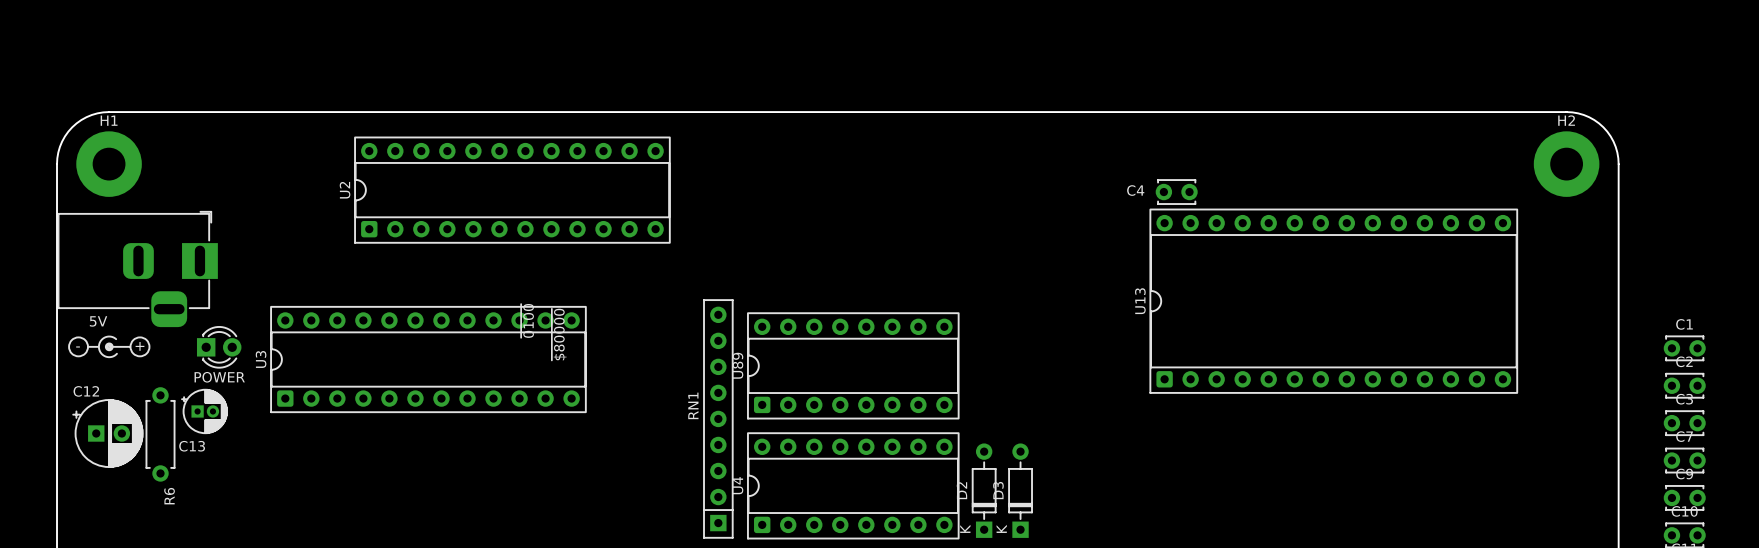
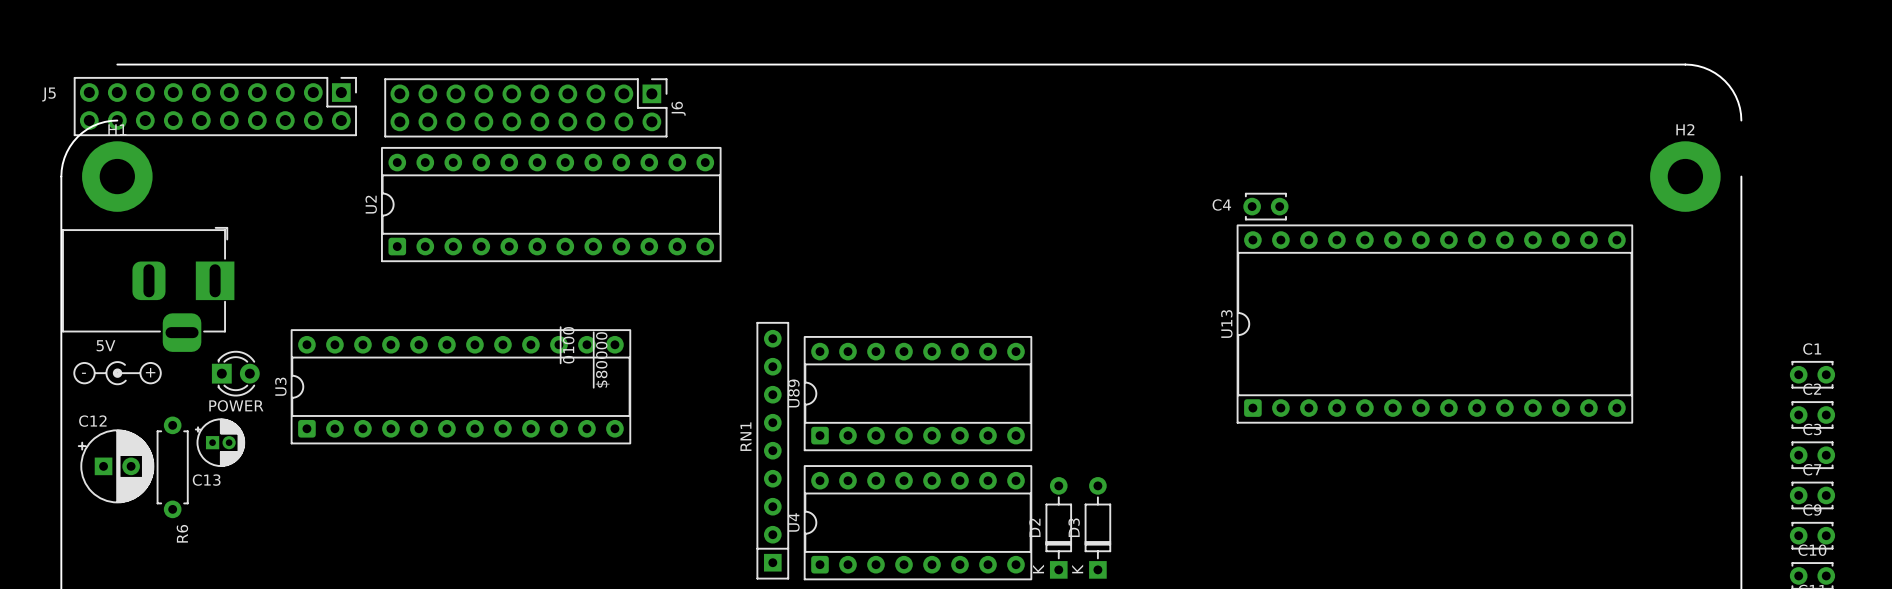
J5: none -> (215, 106)
J6: none -> (525, 107)
board edge: (109, 112) (1566, 112) (1589, 117) (1603, 127) (1613, 141) (1618, 164) -> (117, 64) (1685, 64) (1703, 67) (1724, 80) (1735, 96) (1741, 120)

